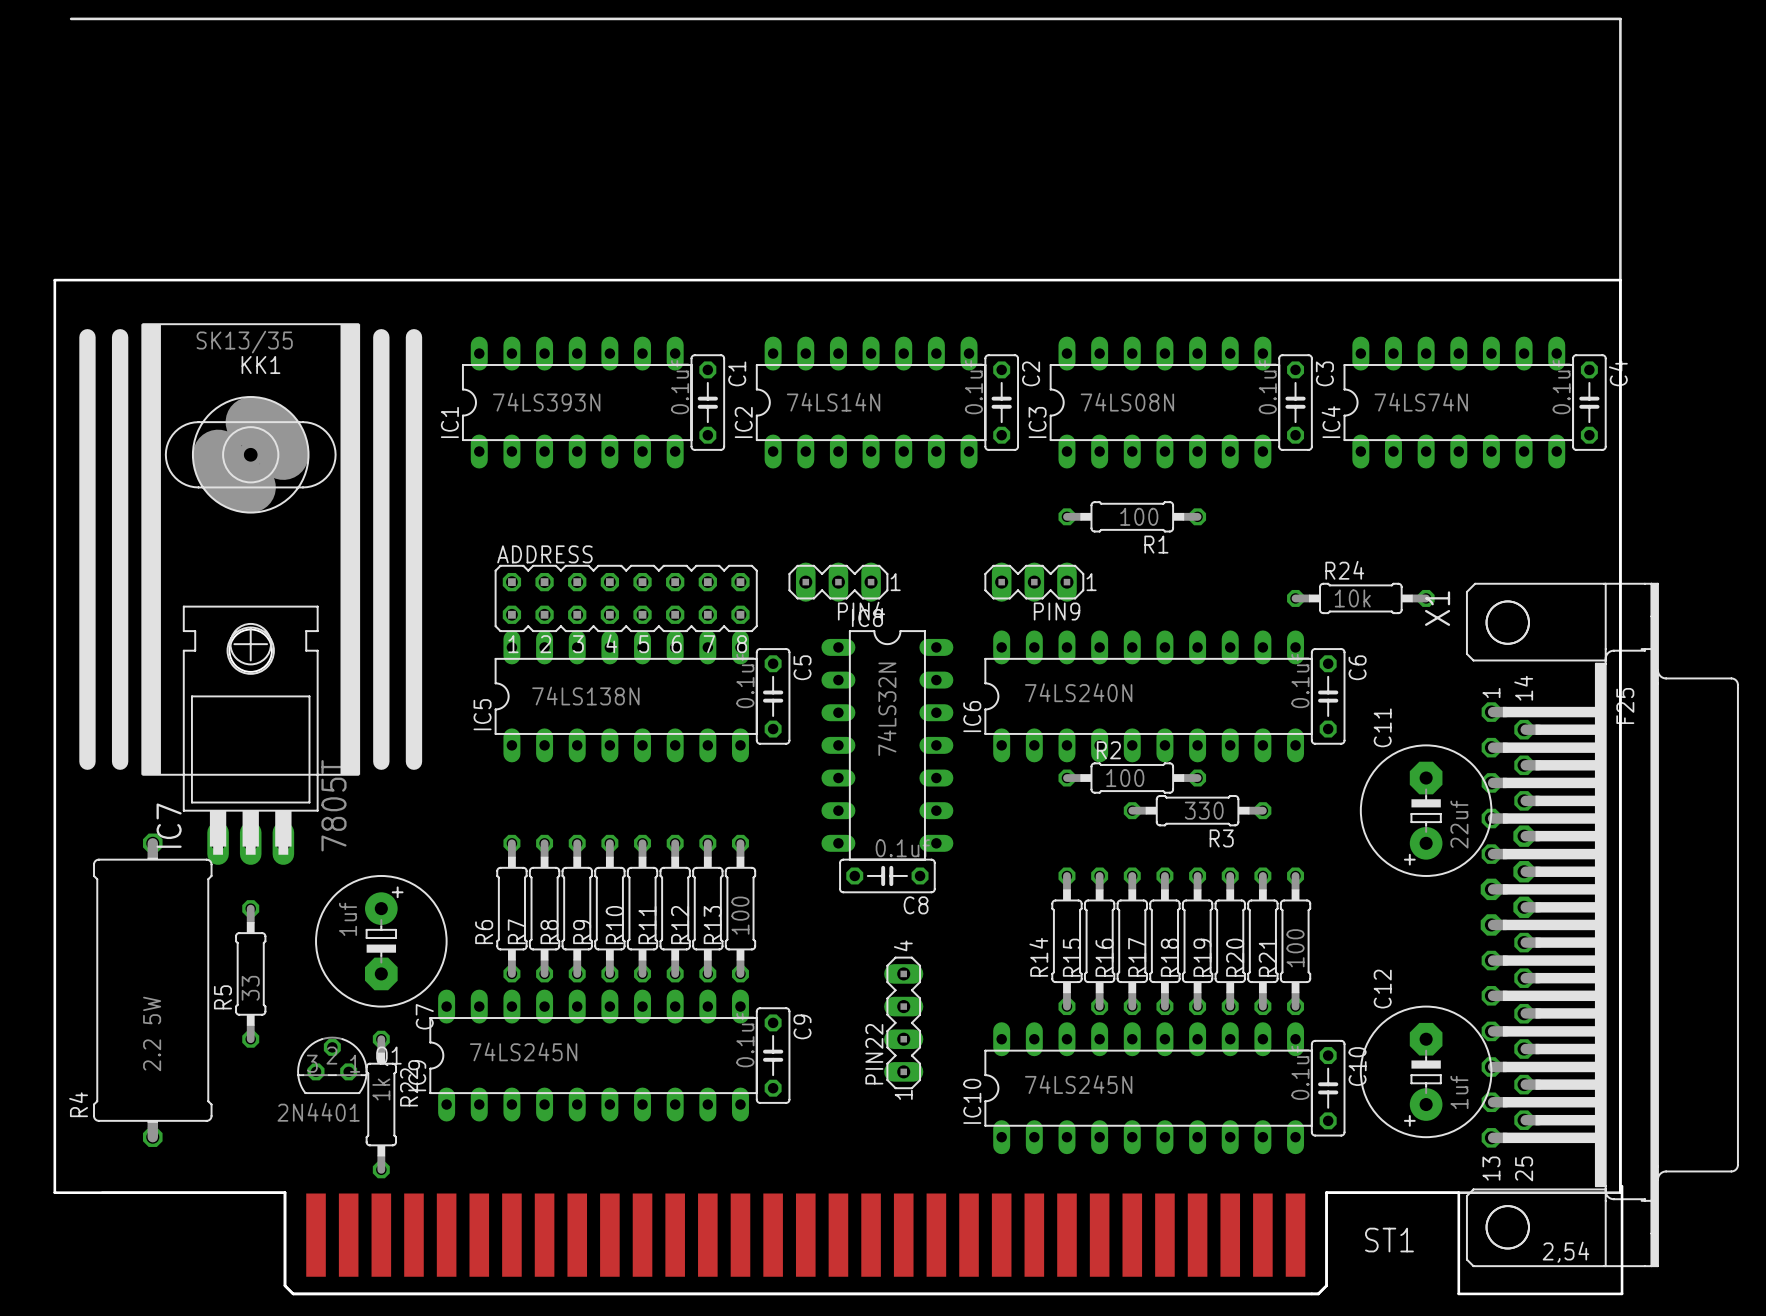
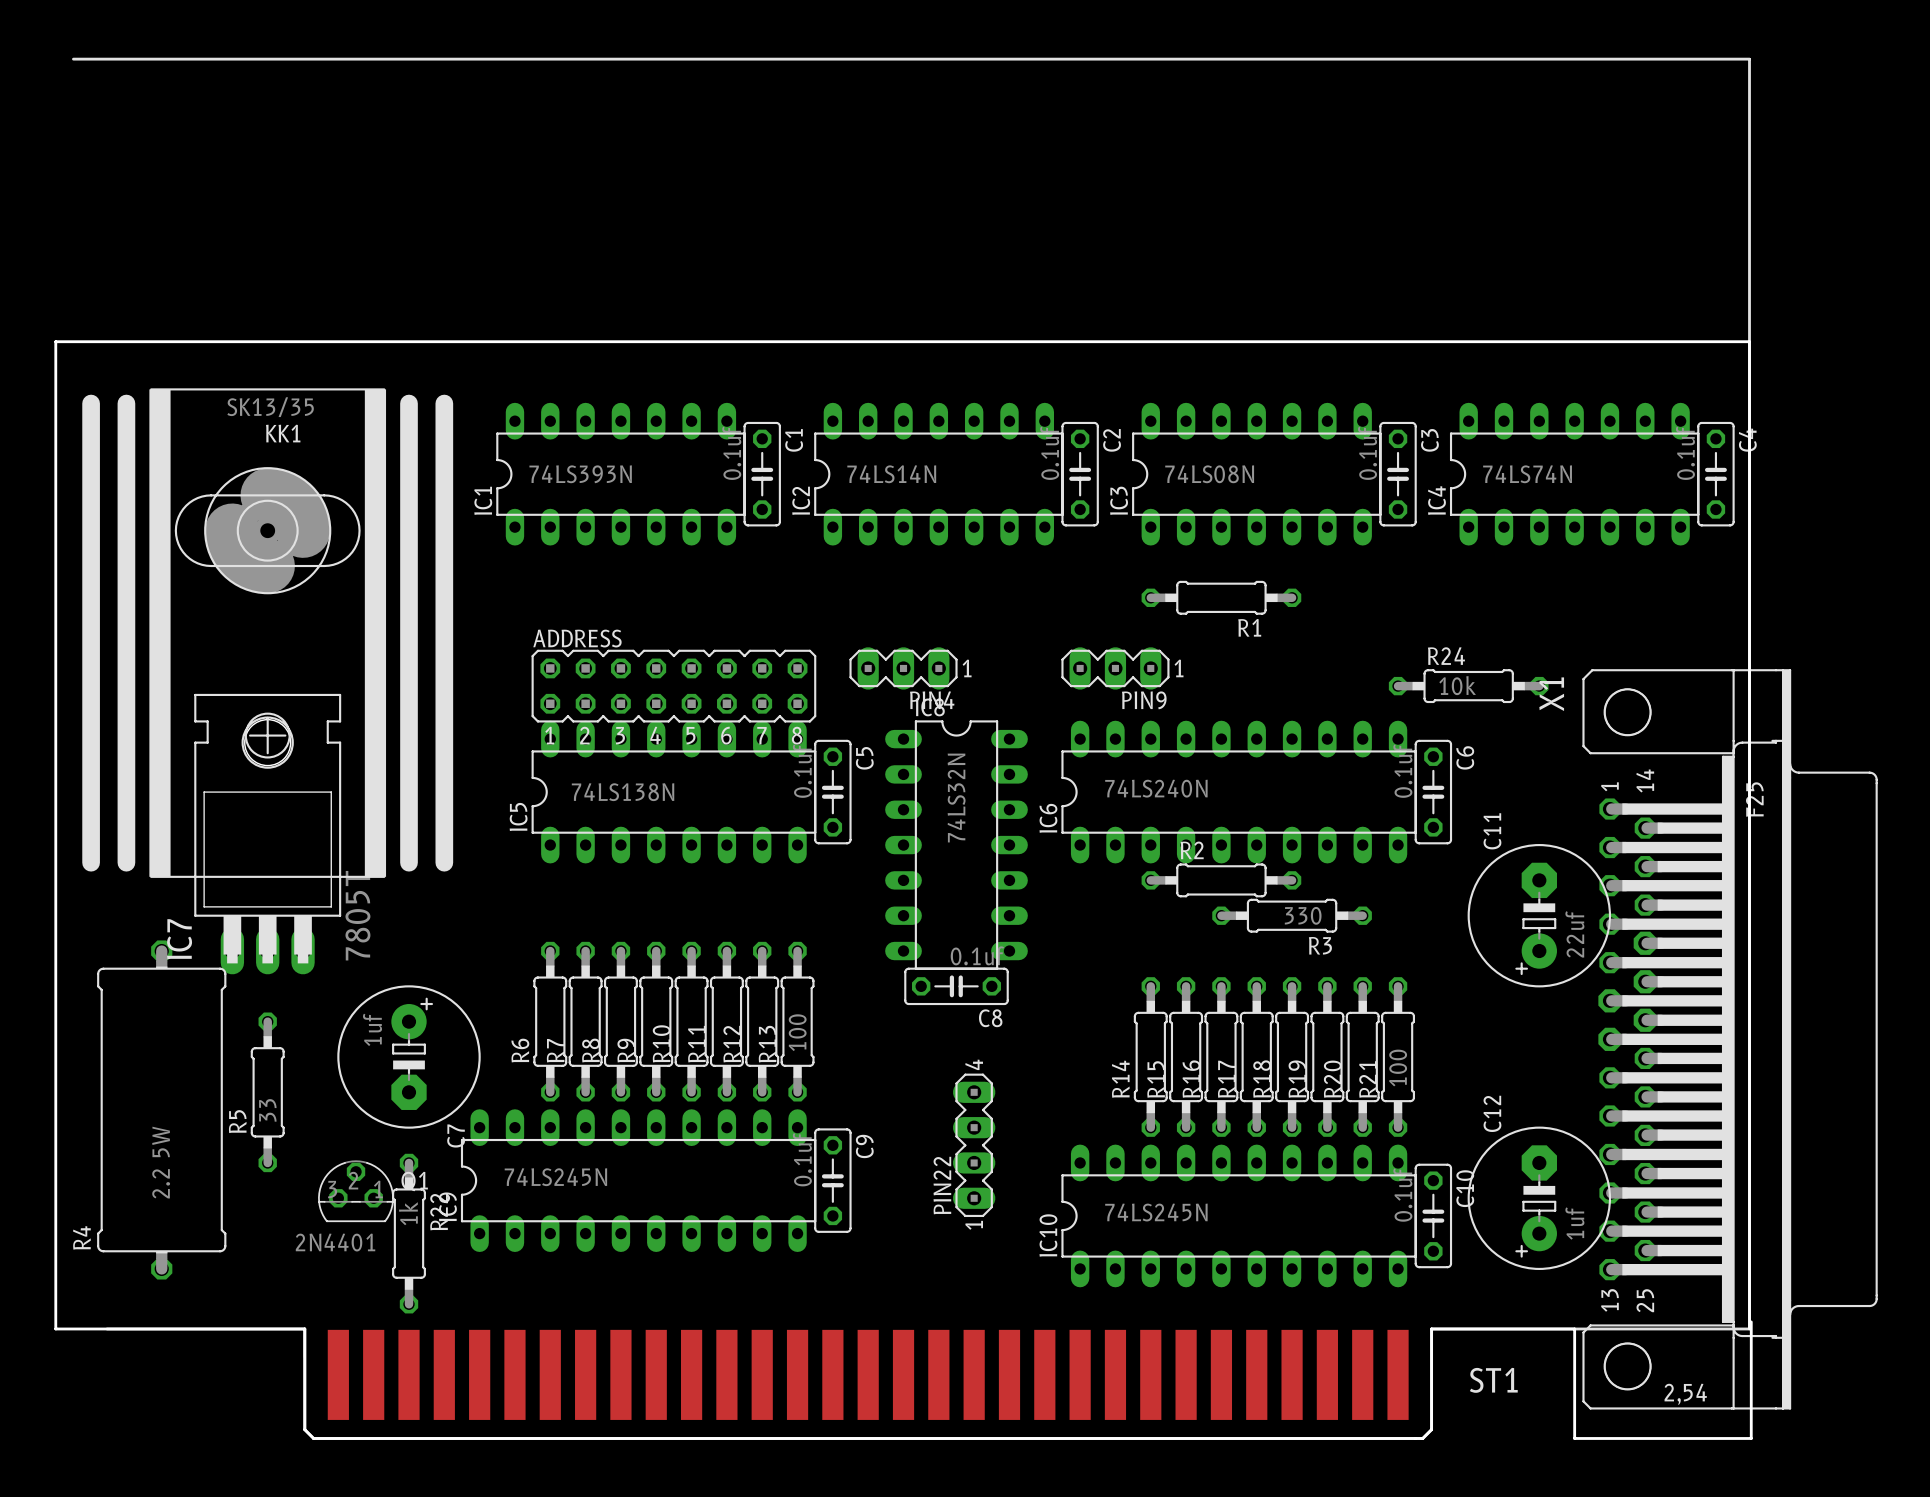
R1 value: 100 (1139, 516) -> none
R2 value: 100 (1125, 778) -> none

